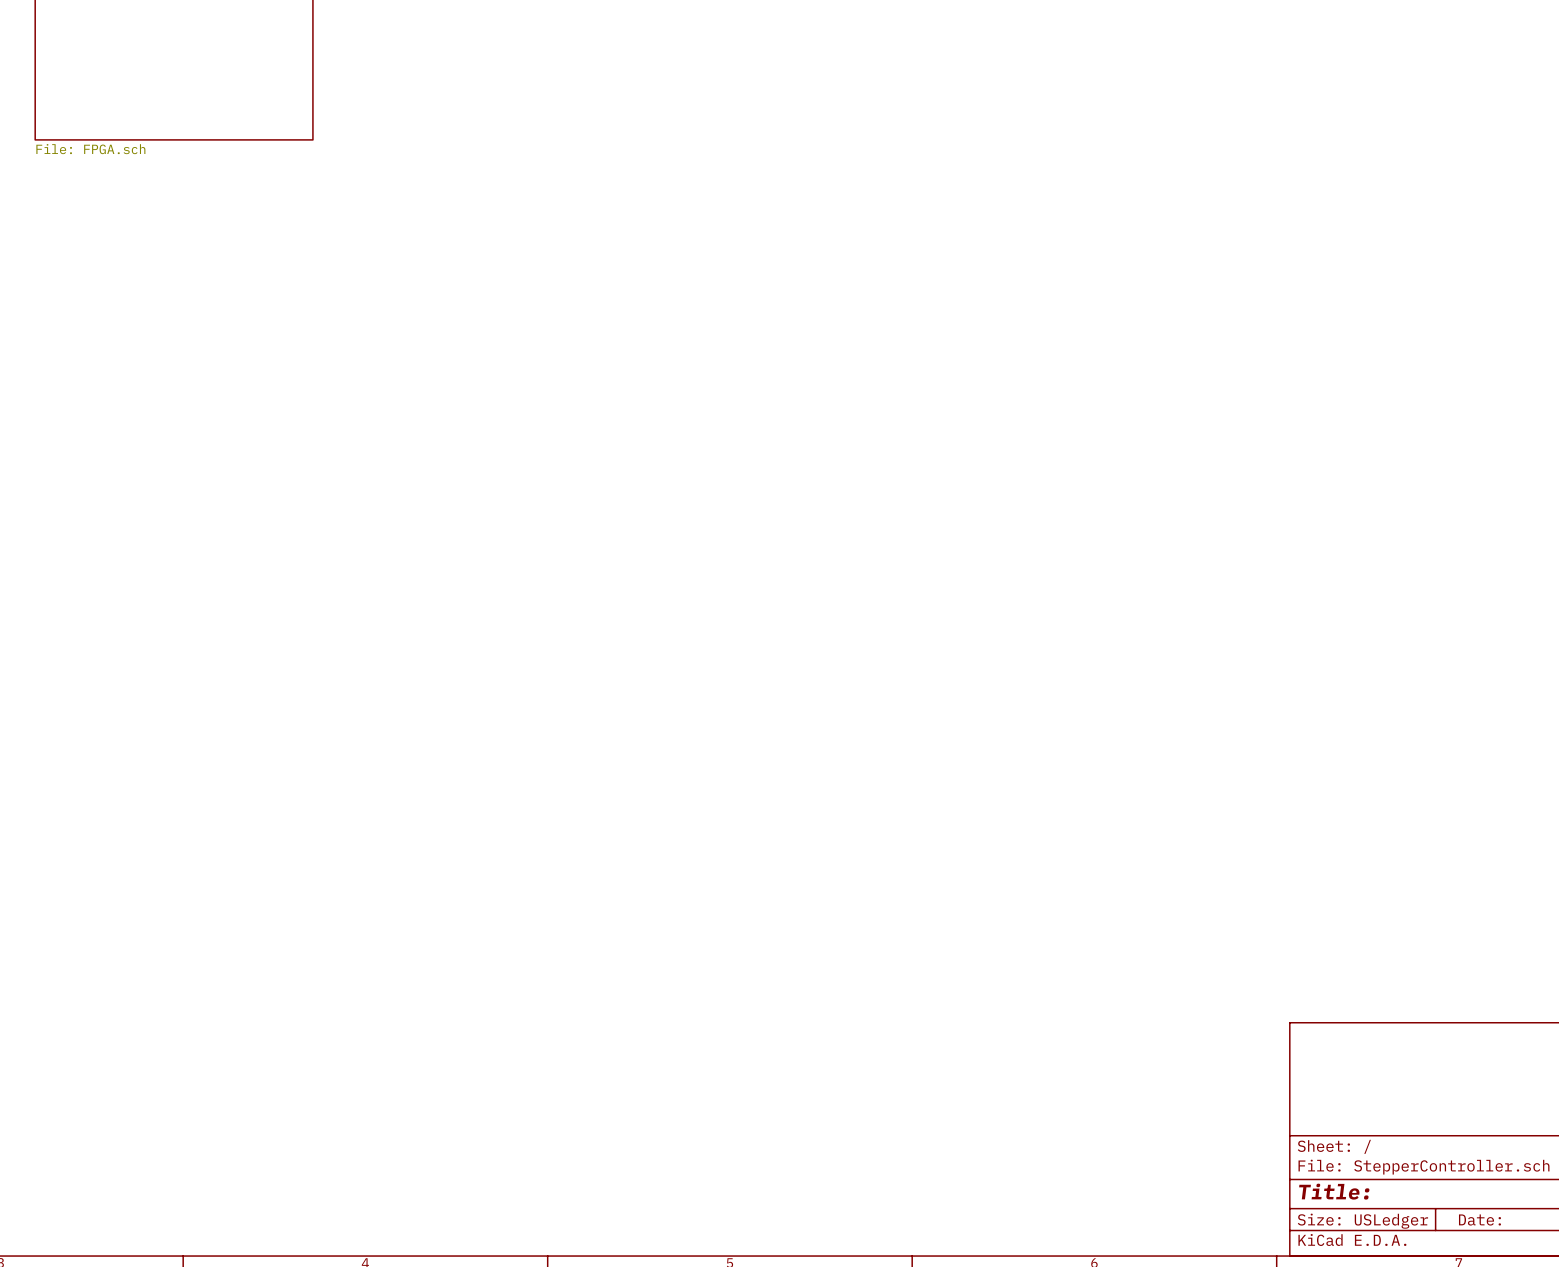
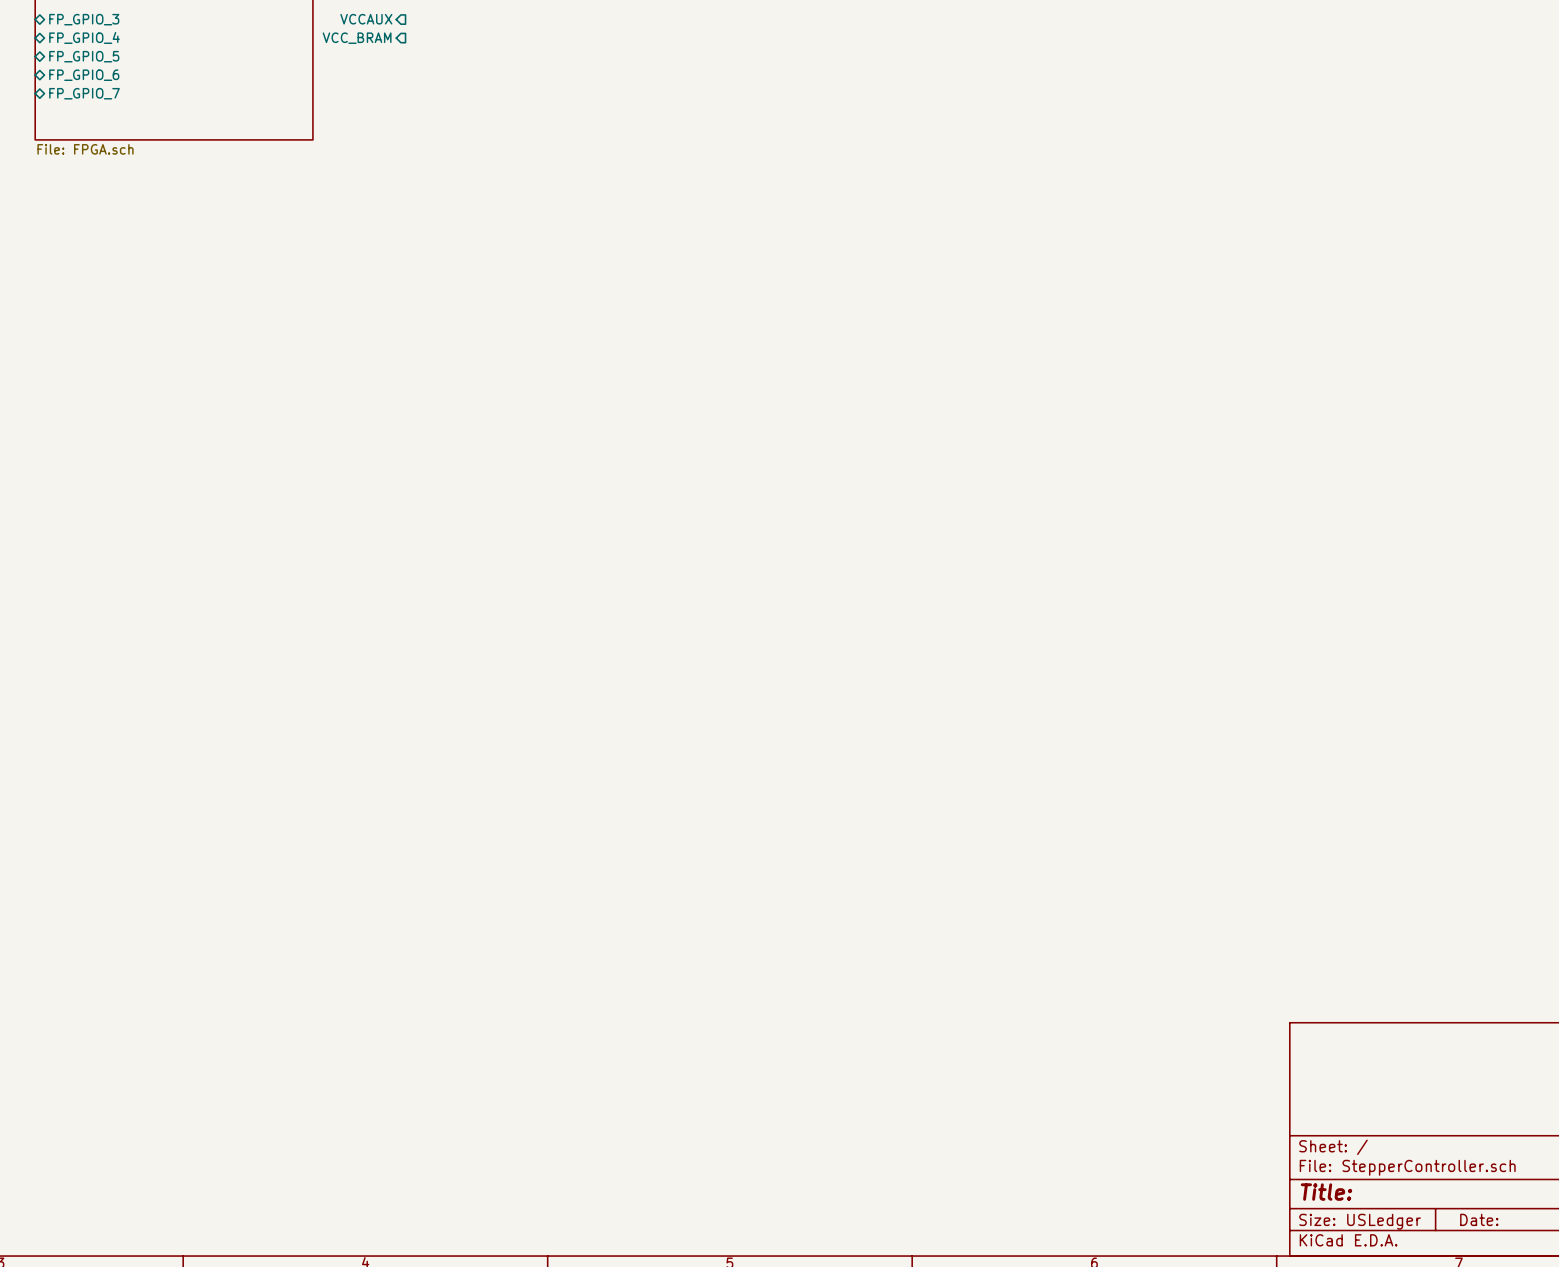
sheet pin: none -> VCCAUX (366, 19)
sheet pin: none -> FP_GPIO_3 (84, 19)
sheet pin: none -> FP_GPIO_4 (84, 37)
sheet pin: none -> VCC_BRAM (357, 38)
sheet pin: none -> FP_GPIO_5 (84, 56)
sheet pin: none -> FP_GPIO_6 (84, 75)
sheet pin: none -> FP_GPIO_7 (84, 93)

